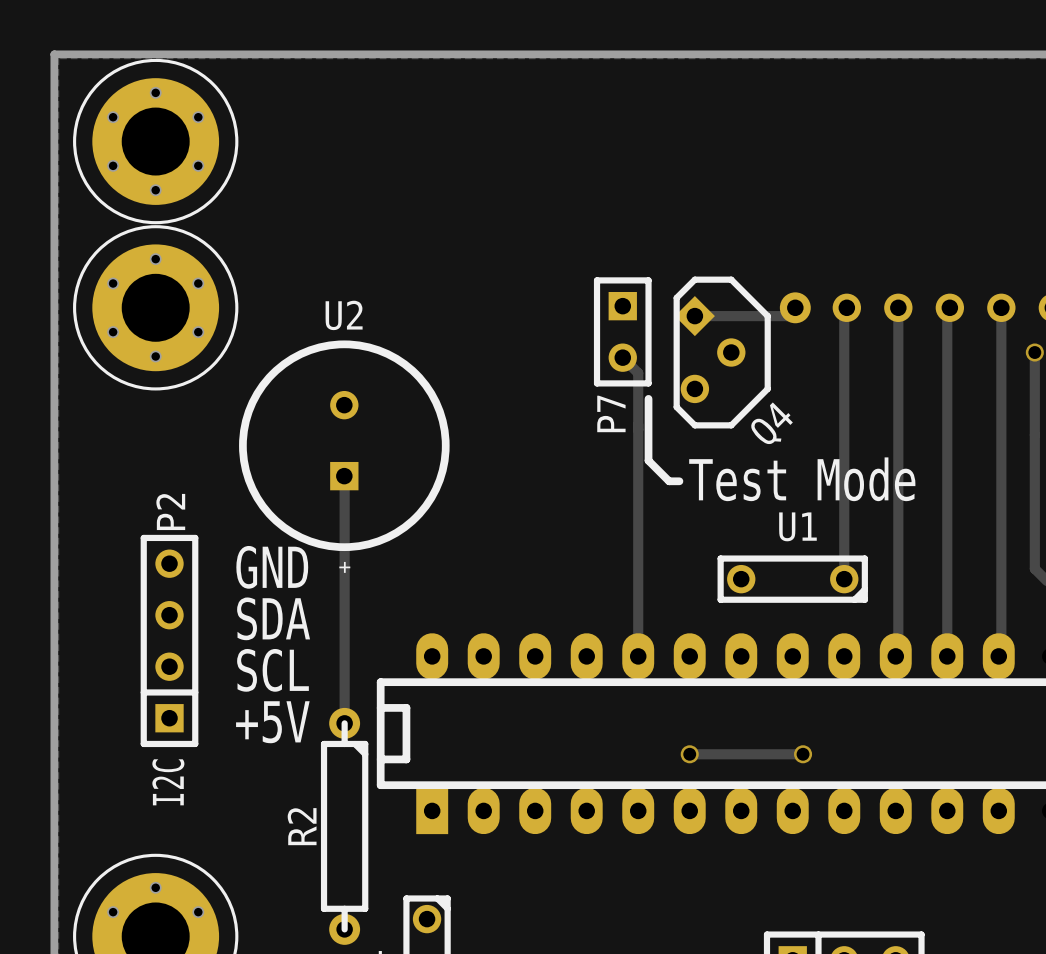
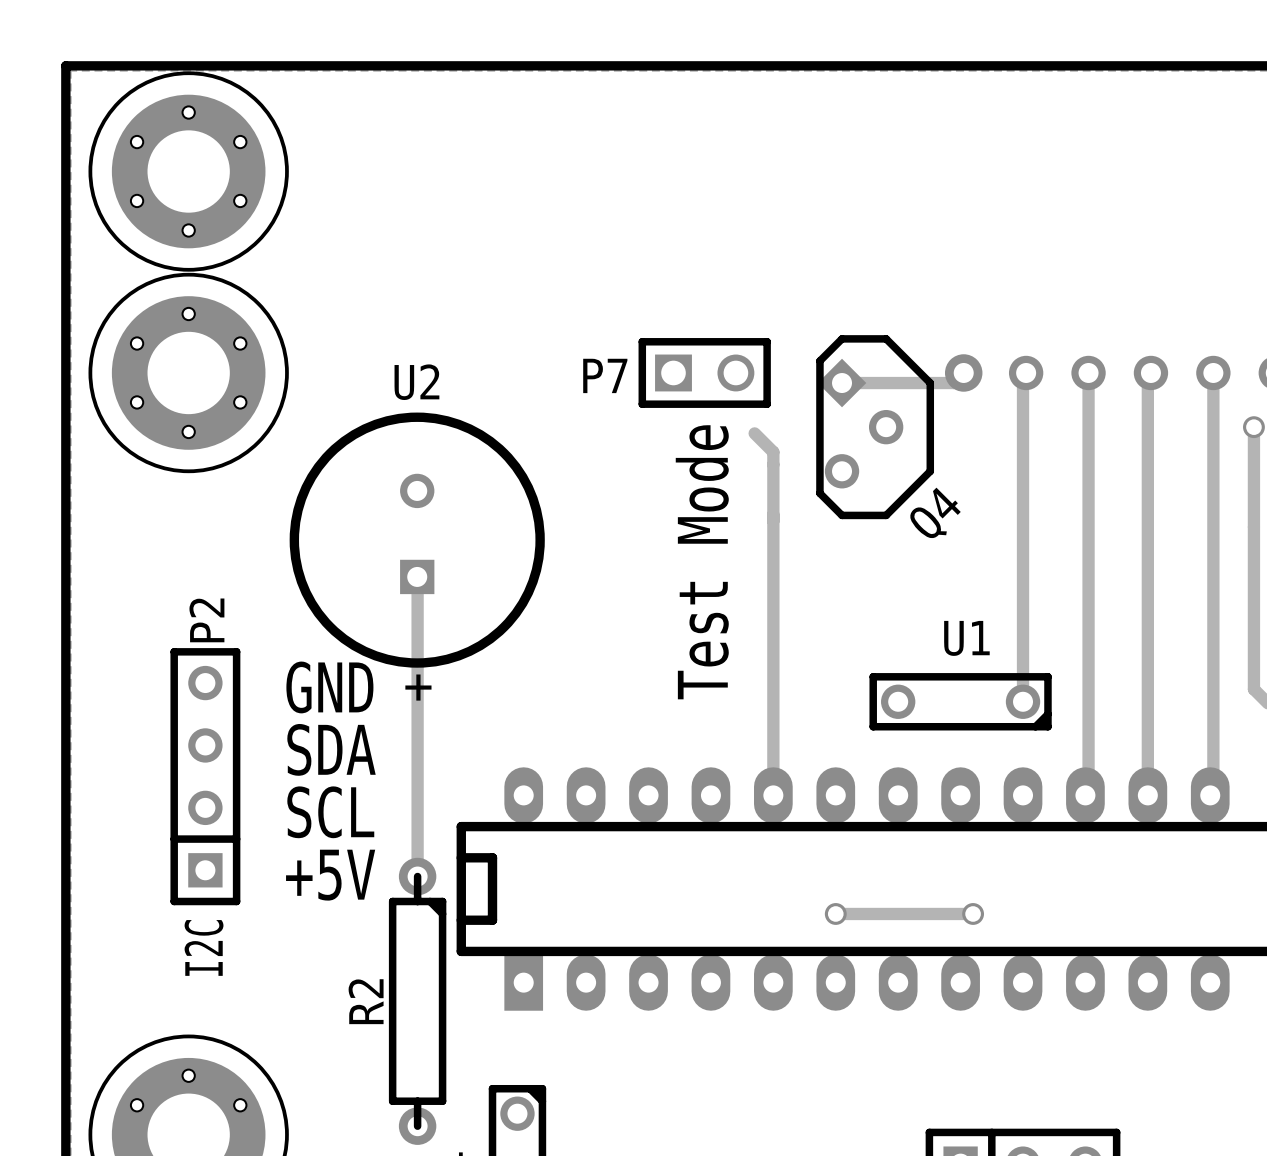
P7 footprint: [593, 277, 652, 387] -> [638, 338, 771, 408]
U2 footprint: [239, 340, 450, 552] -> [289, 412, 545, 668]
line: (648, 398) (648, 460) (669, 481) (679, 481) -> none
P7 name position: P7 (611, 413) -> P7 (605, 375)
text rotation: 0° (802, 479) -> 90° counterclockwise (702, 562)

